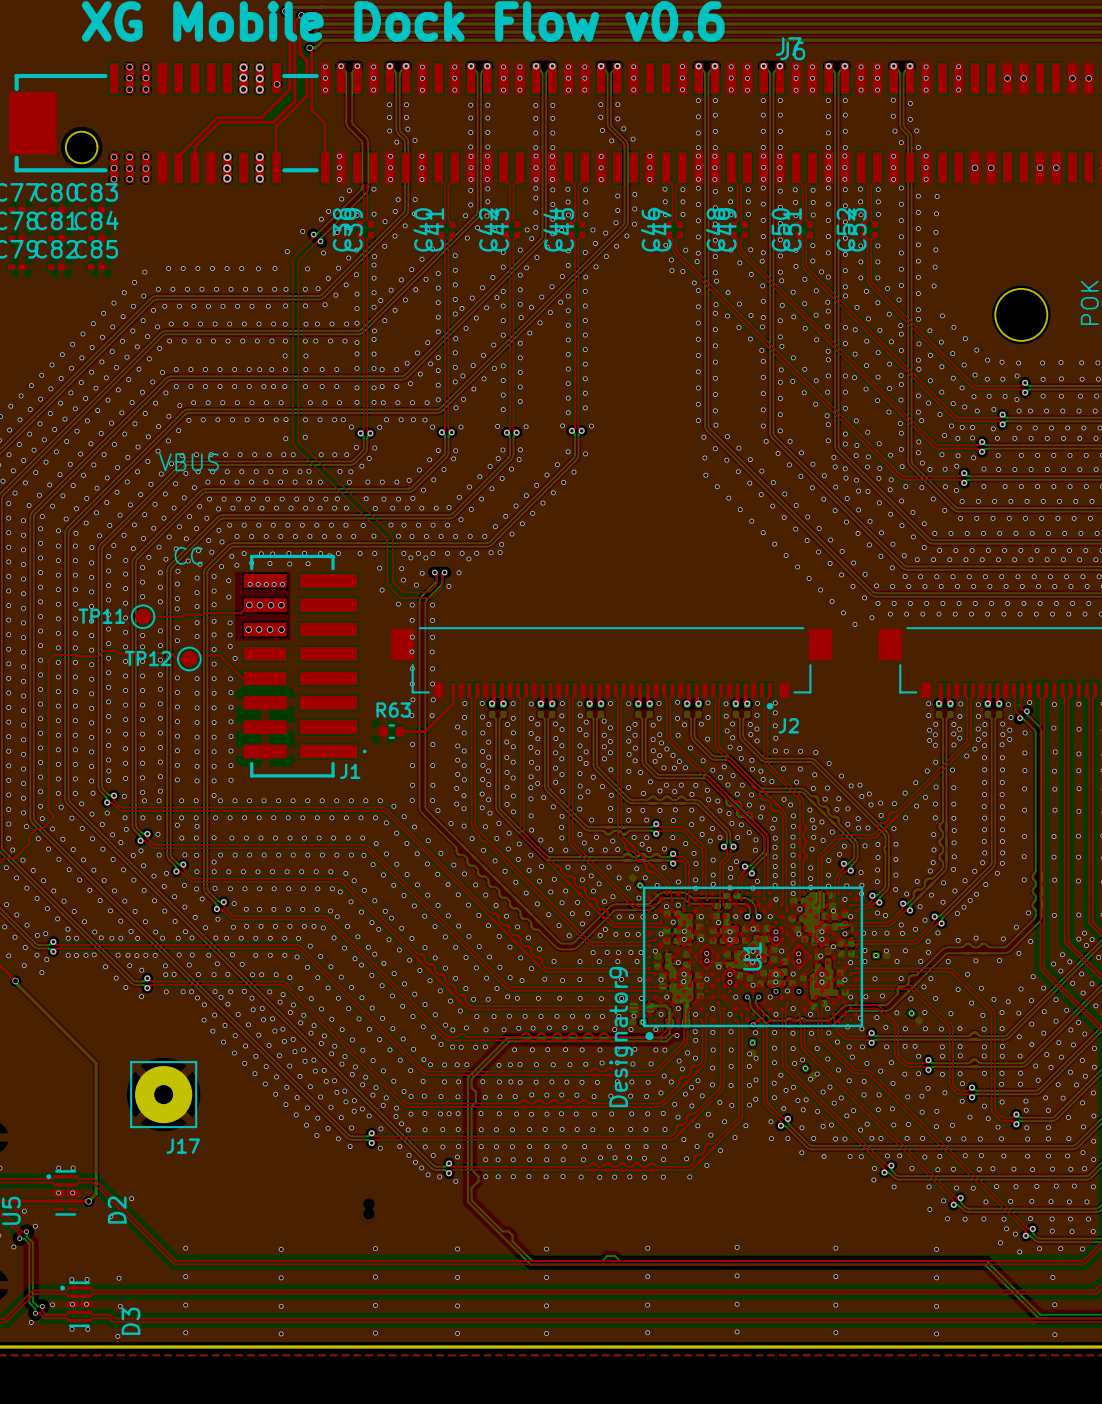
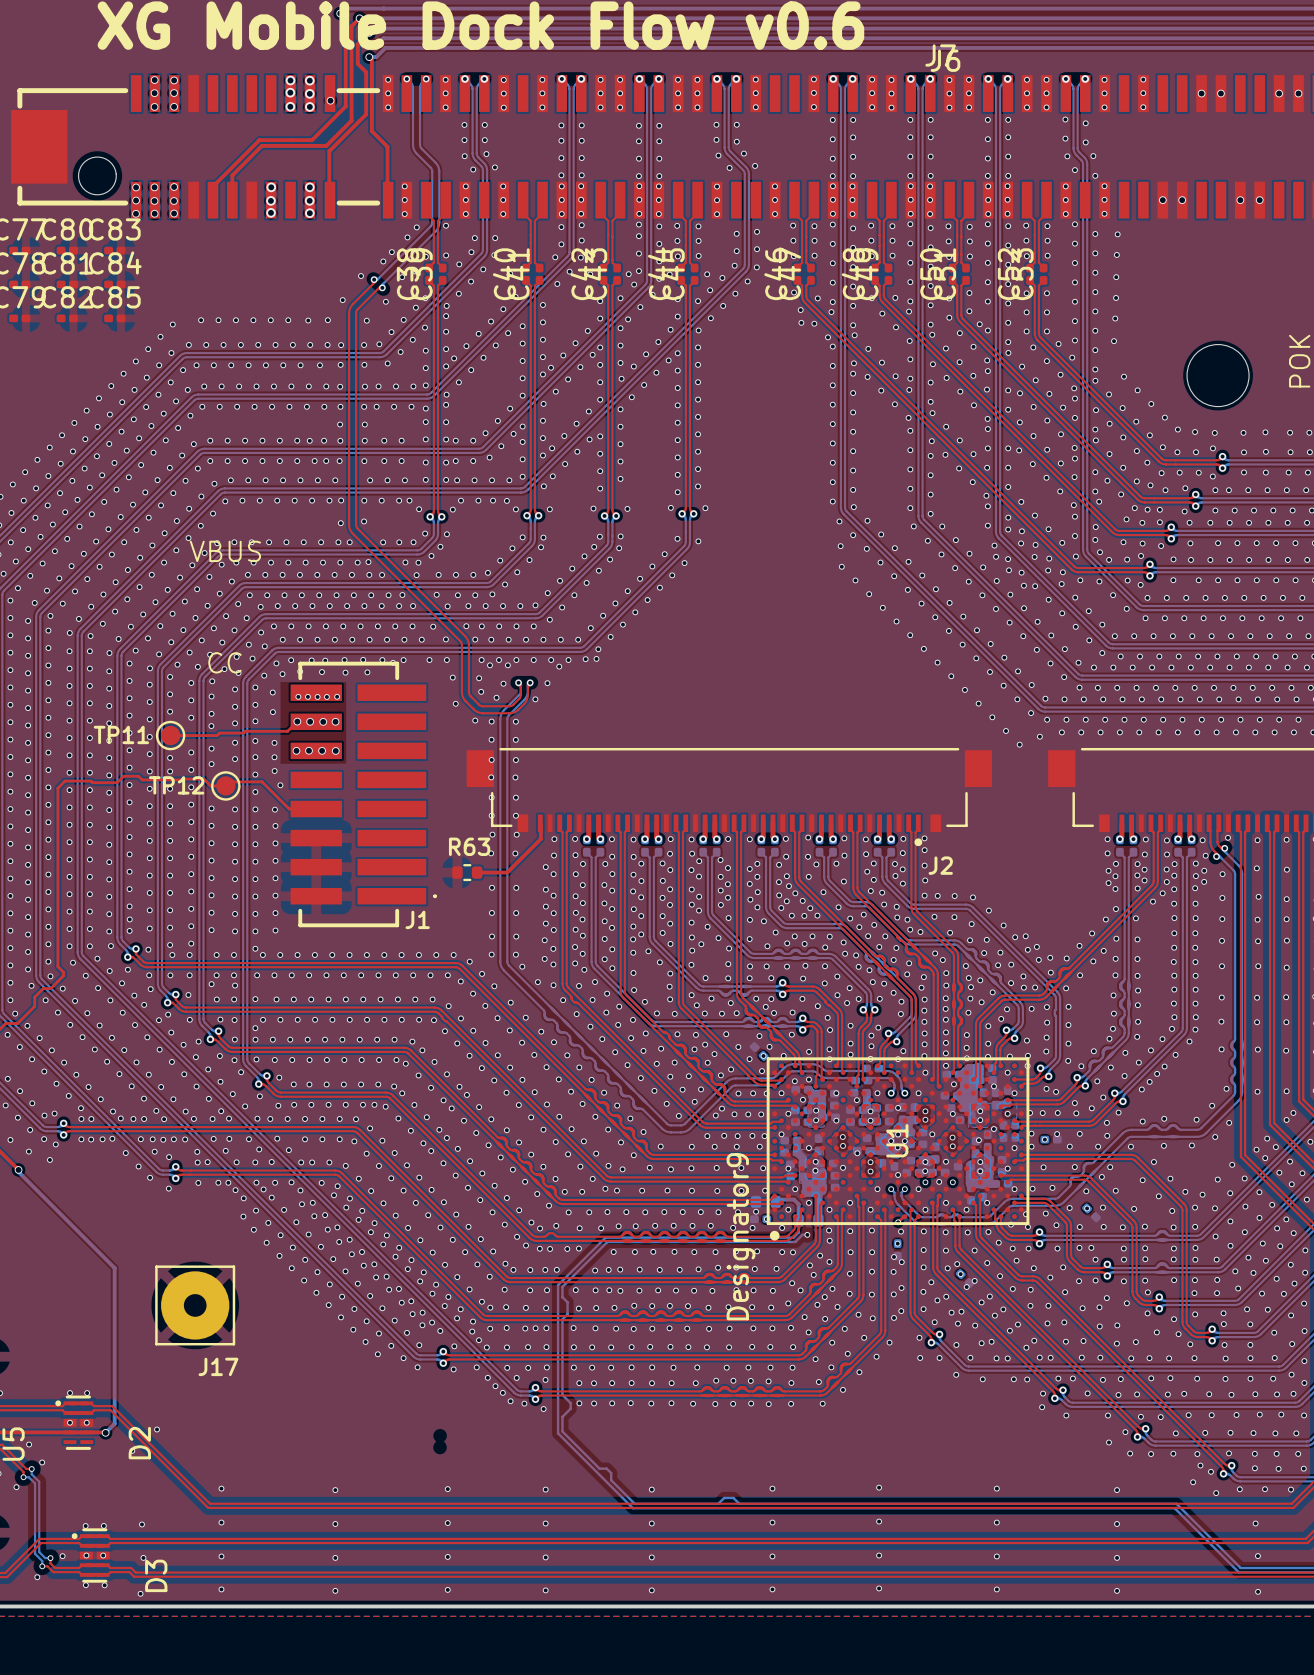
via: (1092, 939) -> none
via: (1086, 945) -> none

